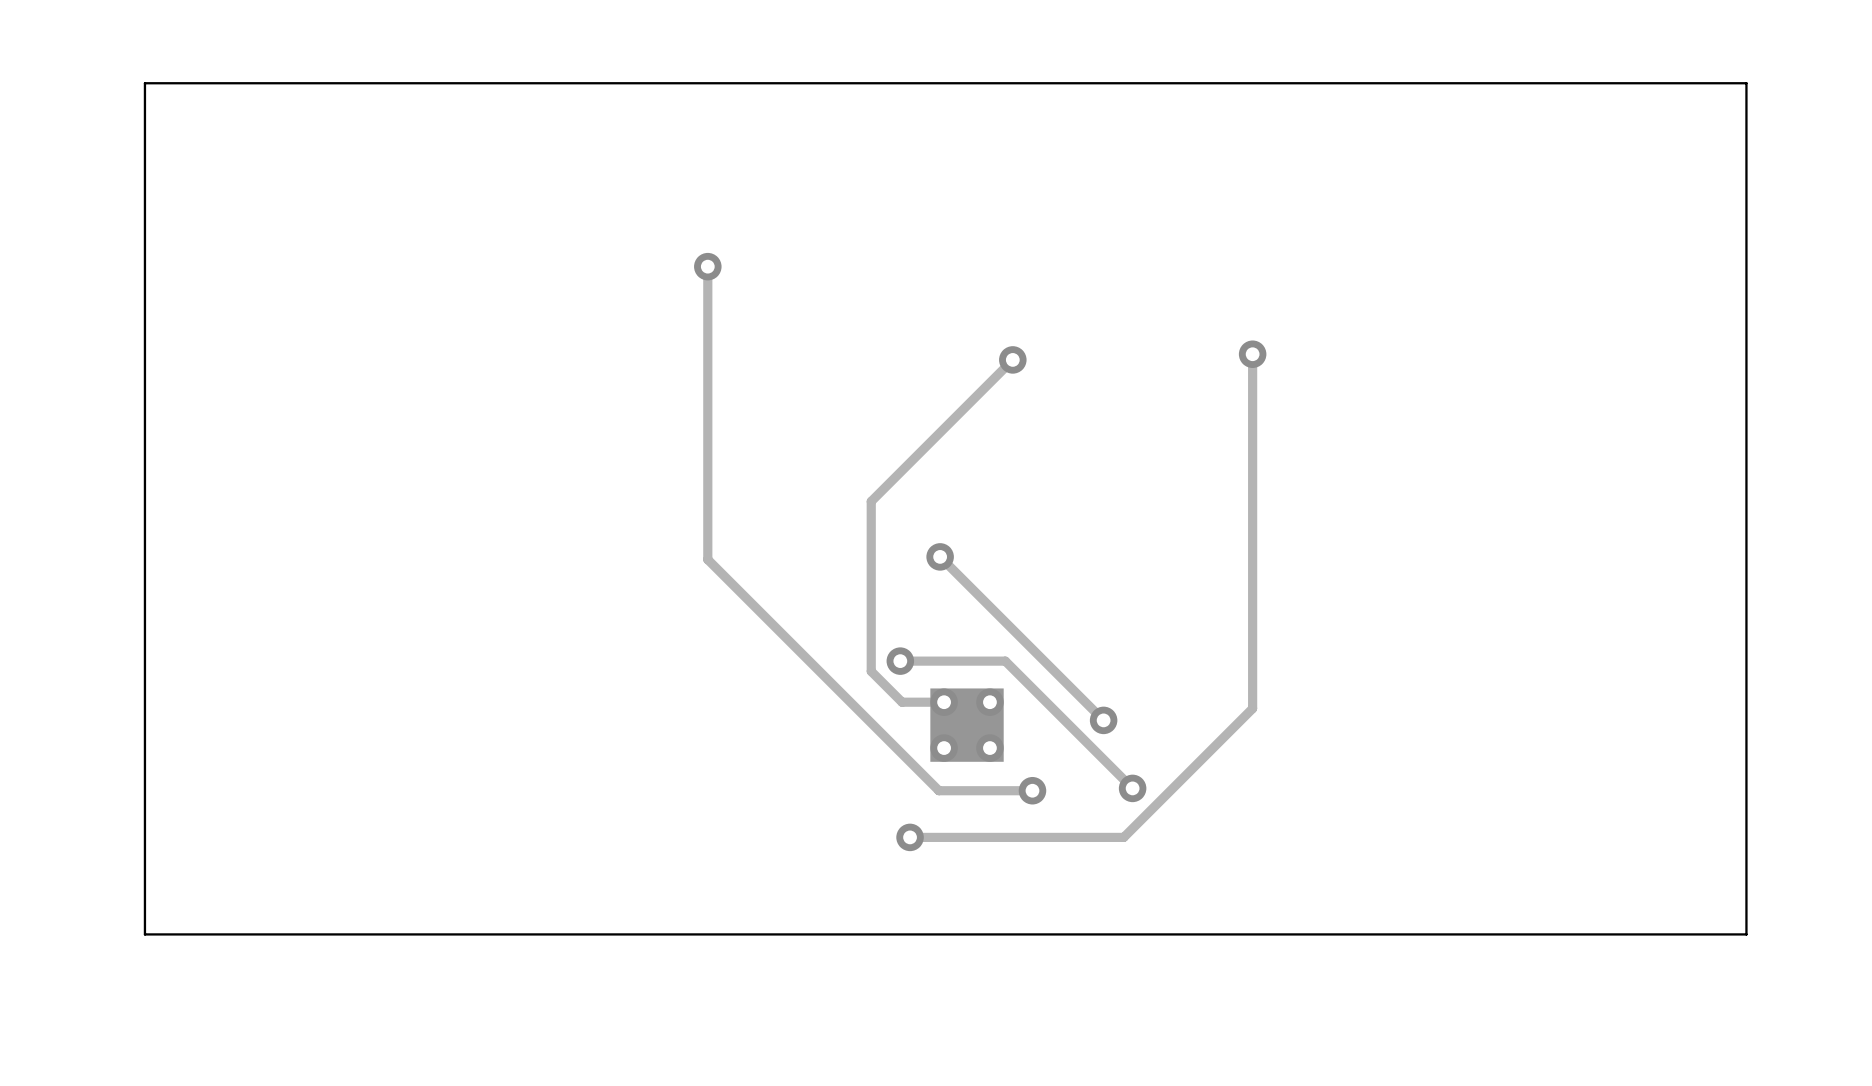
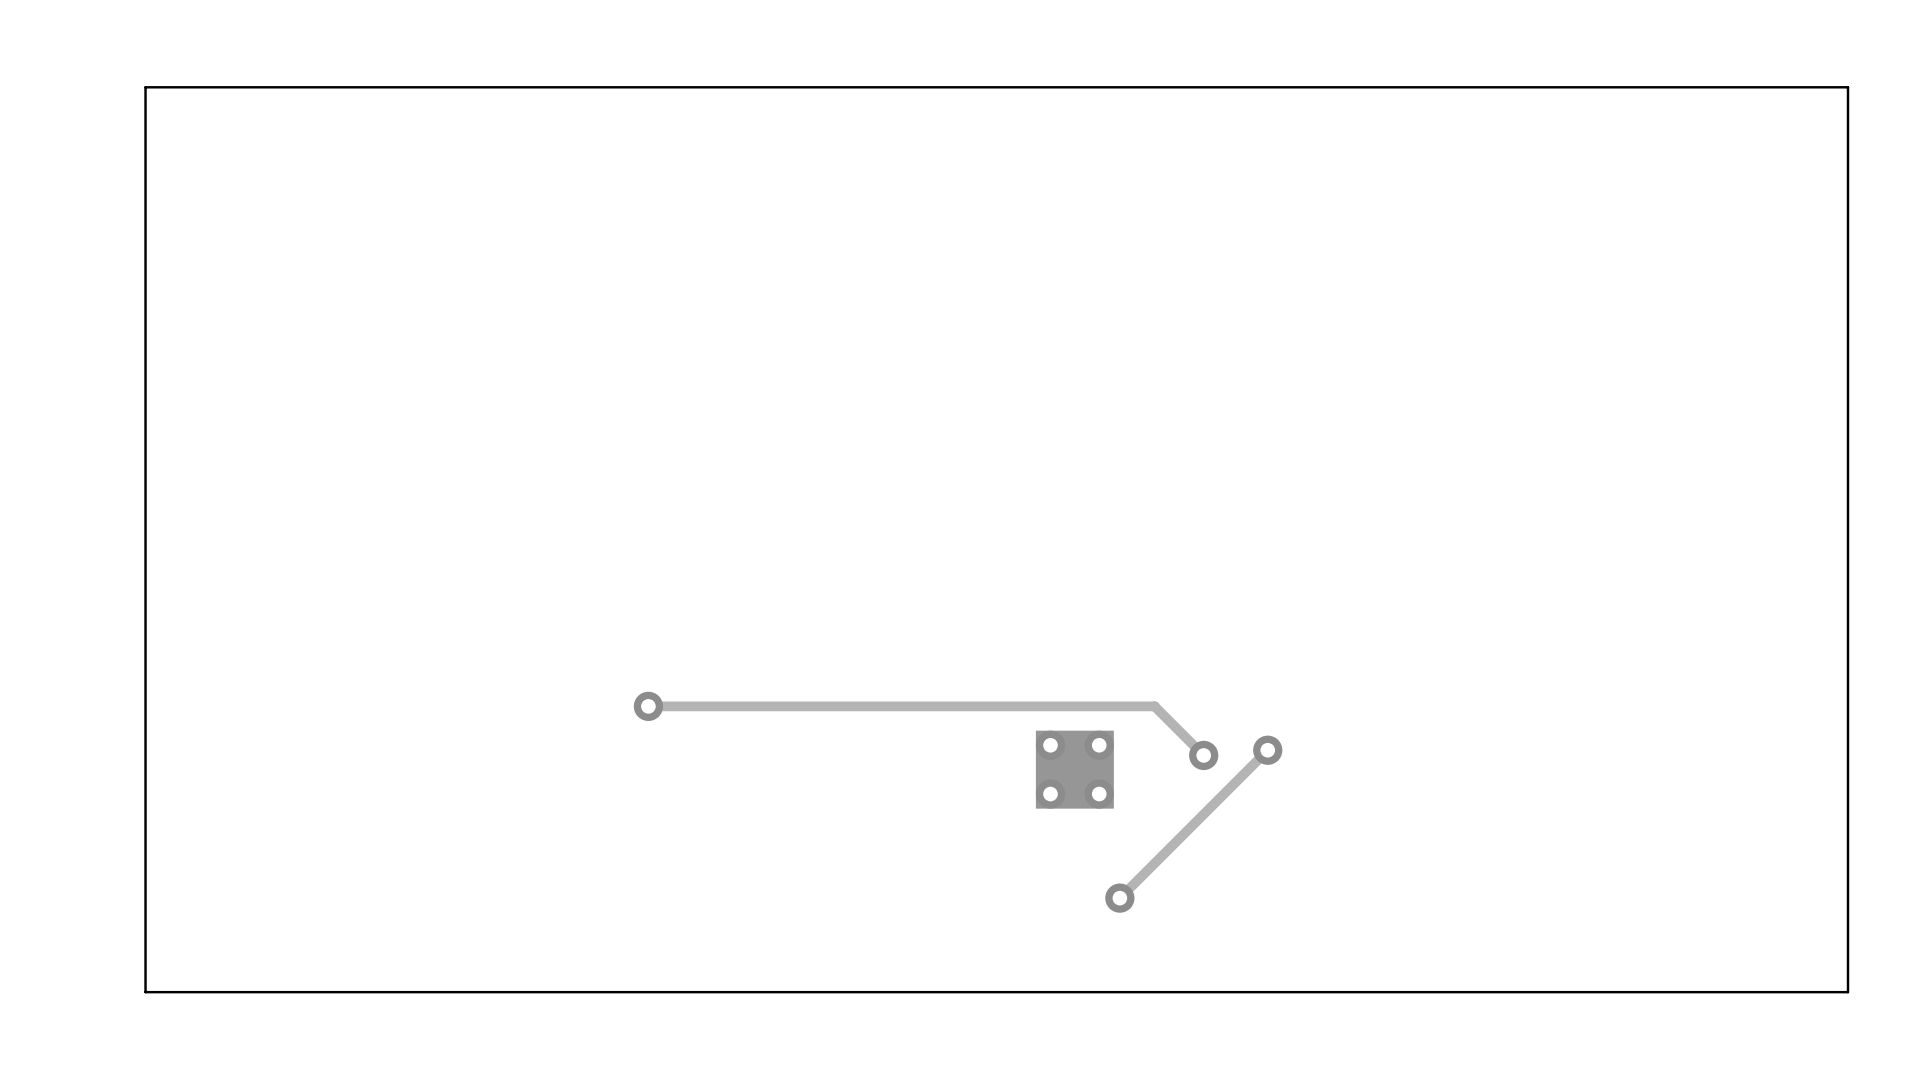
track: (707, 266) (707, 559) (938, 790) (1032, 790) -> none
via: (707, 266) -> none
track: (1252, 354) (1252, 708) (1123, 837) (910, 837) -> none
via: (1252, 354) -> none
track: (1012, 359) (871, 501) (871, 671) (902, 702) (944, 702) (967, 725) (989, 702) -> none
via: (1012, 359) -> none
track: (940, 556) (1103, 720) -> none
via: (940, 556) -> none
track: (900, 661) (1005, 661) (1132, 788) -> none
via: (900, 661) -> none
track: none -> (648, 706) (1154, 706) (1203, 755)
via: none -> (648, 706)
track: none -> (1267, 750) (1119, 898)
via: none -> (1267, 750)
via position: (1103, 720) -> (1203, 755)
part position: (967, 725) -> (1074, 769)
via: (1132, 788) -> none
via: (1032, 790) -> none
via: (910, 837) -> none
via: none -> (1119, 898)

